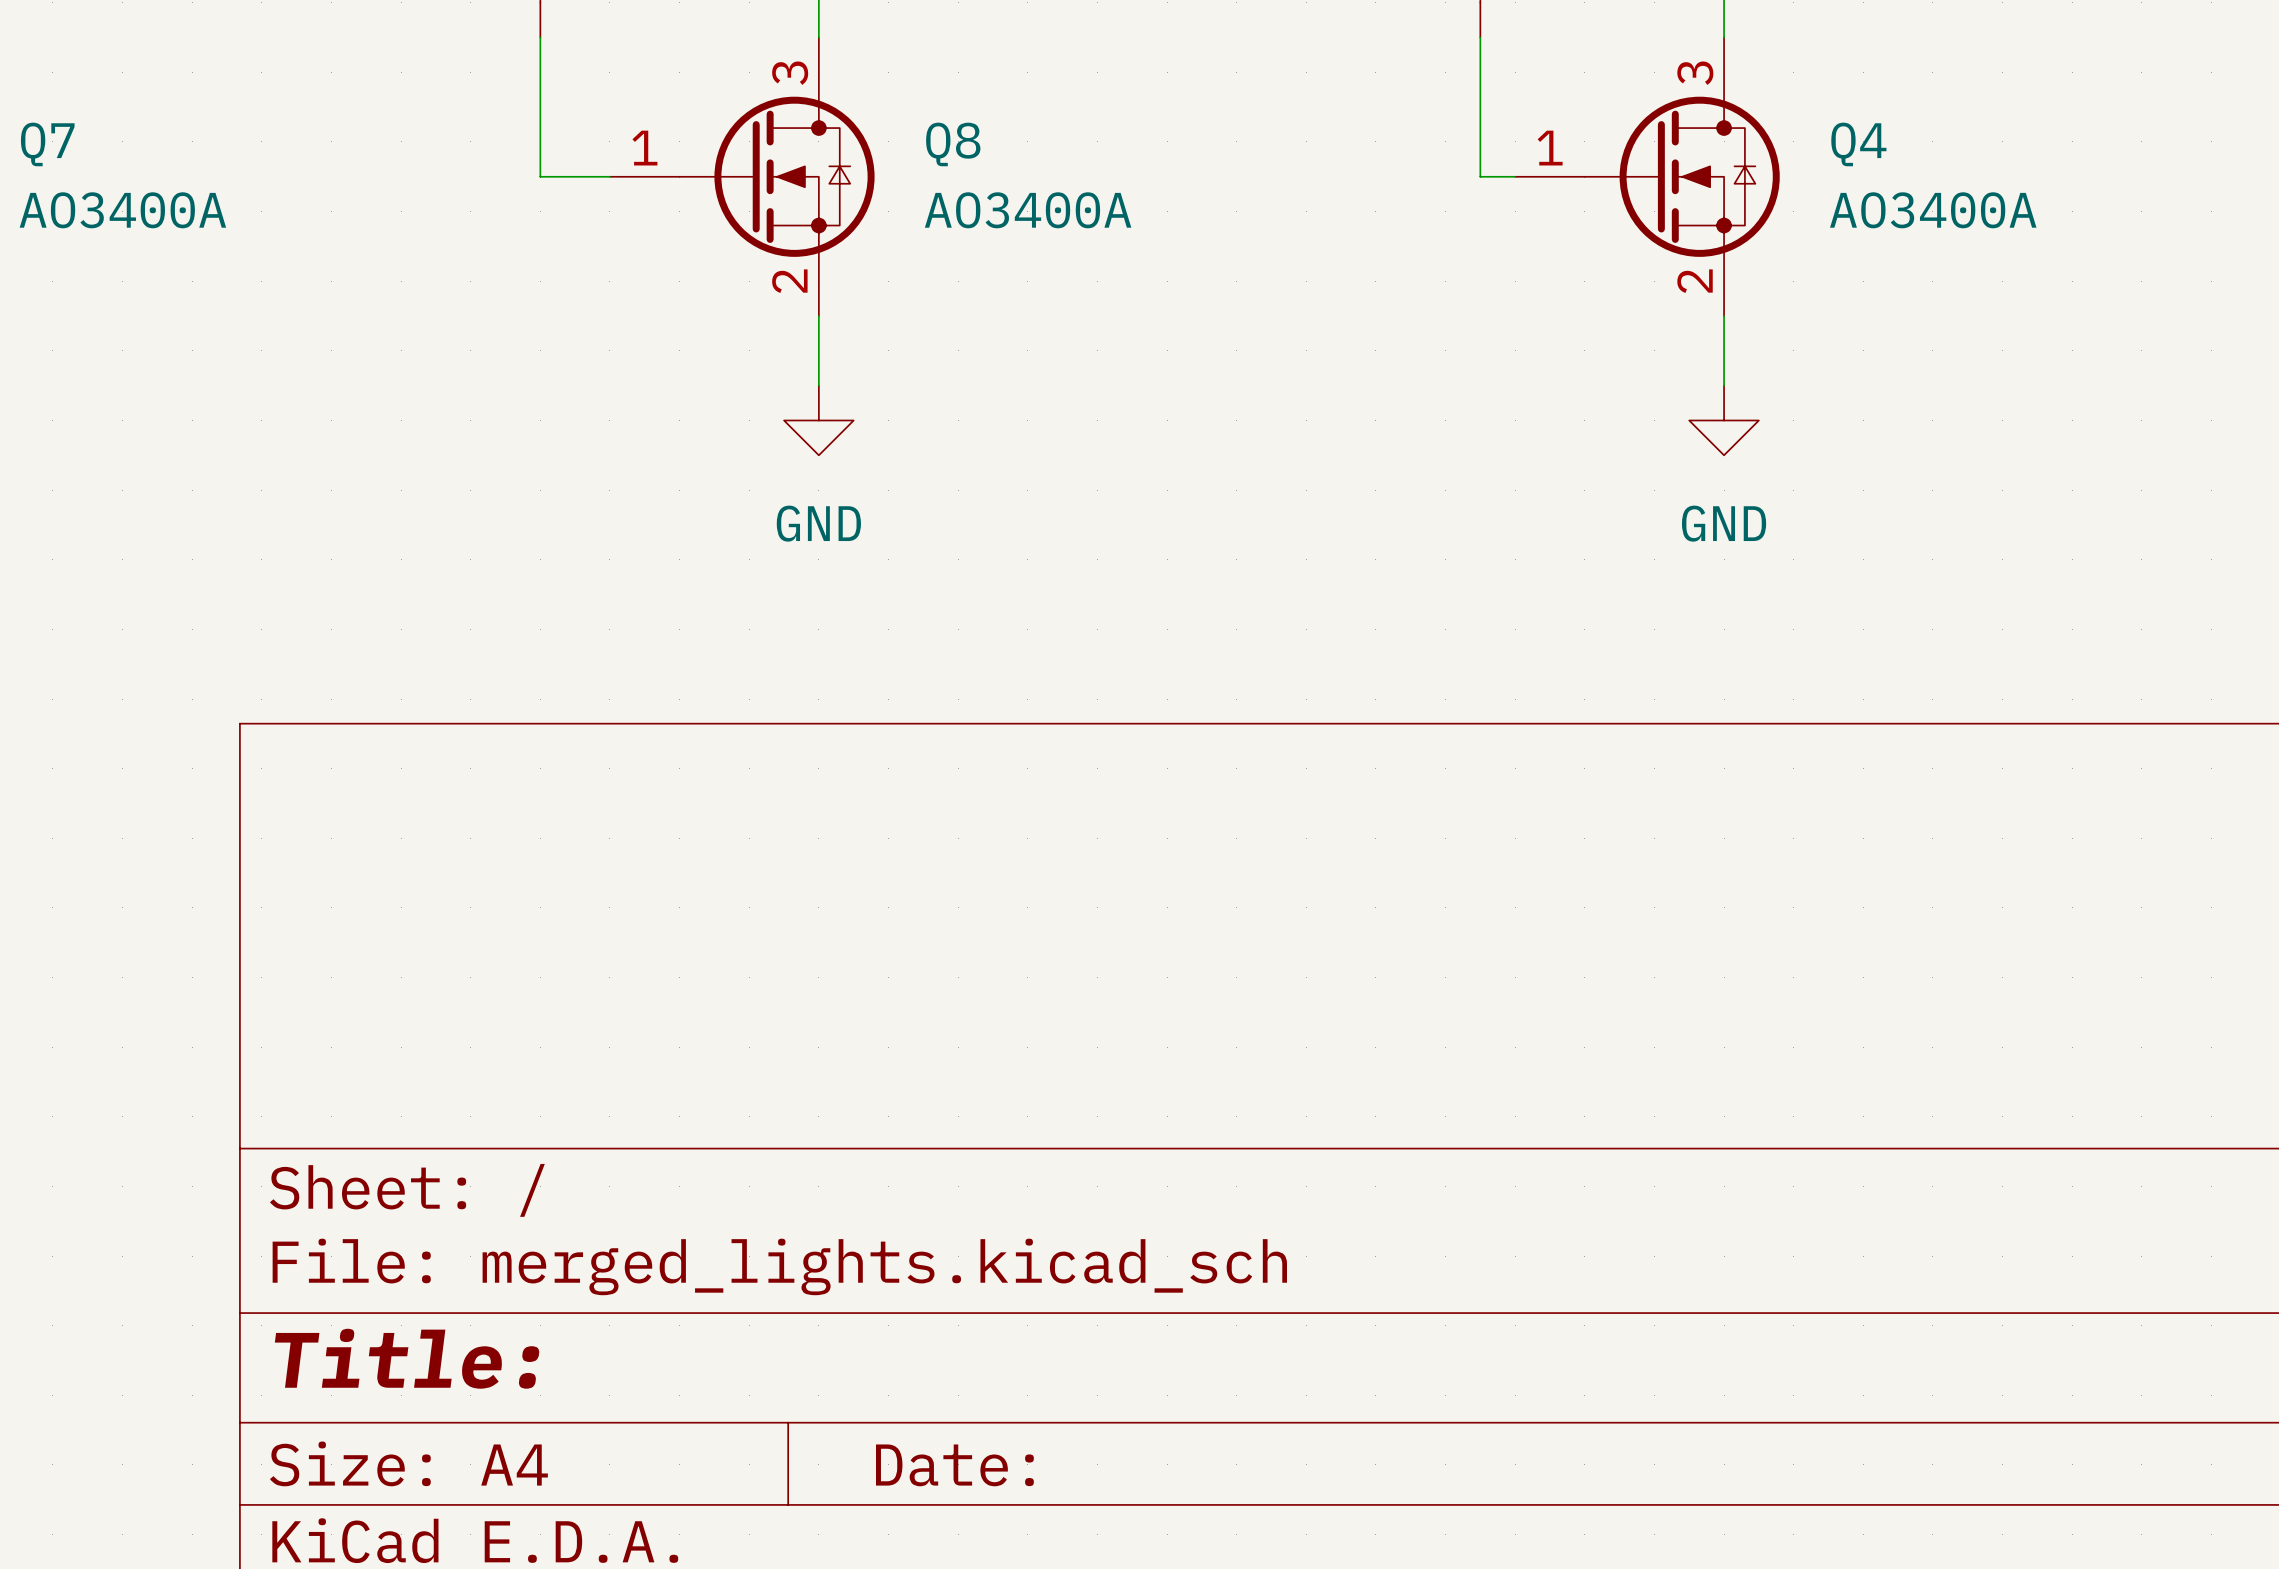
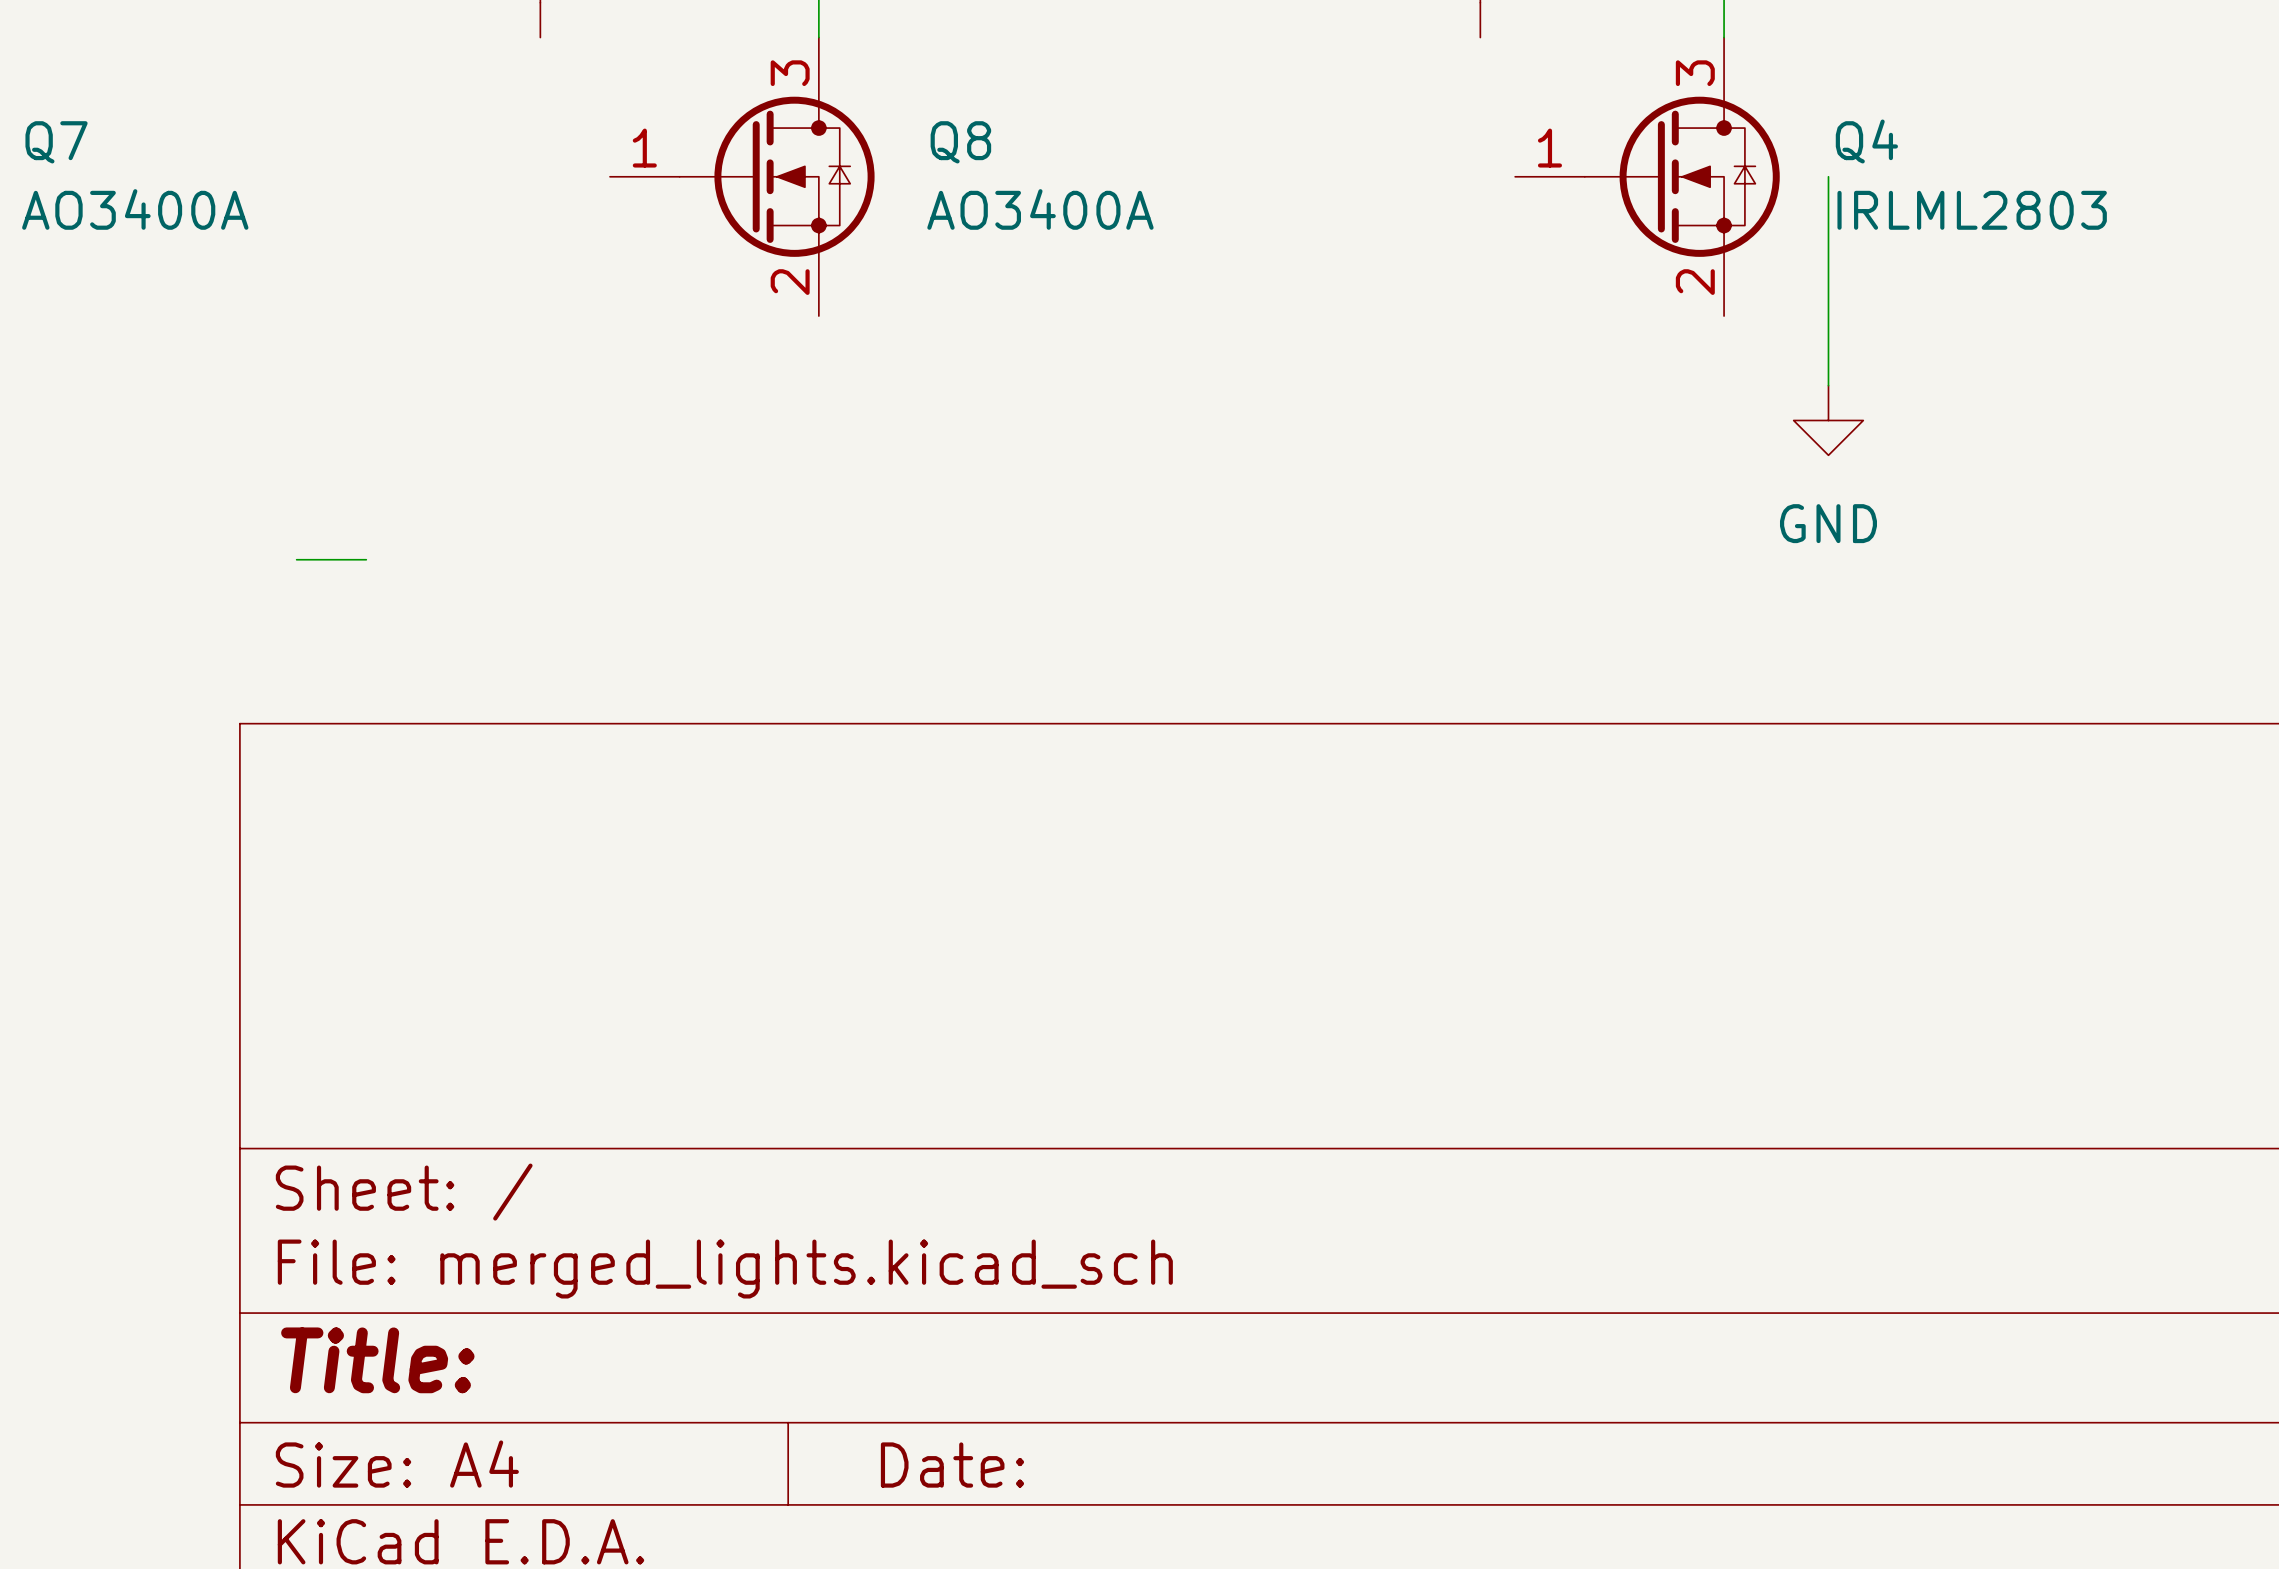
wire: (540, 37) (540, 176) (609, 176) -> none
wire: (1480, 37) (1480, 176) (1515, 176) -> none
wire: none -> (1828, 176) (1828, 385)
Q4 value: AO3400A (1933, 210) -> IRLML2803 (1972, 210)
wire: (818, 316) (818, 385) -> none
wire: (1724, 316) (1724, 385) -> none
power symbol: GND (818, 420) -> none
power symbol position: GND (1724, 420) -> GND (1828, 420)
wire: none -> (296, 559) (366, 559)

